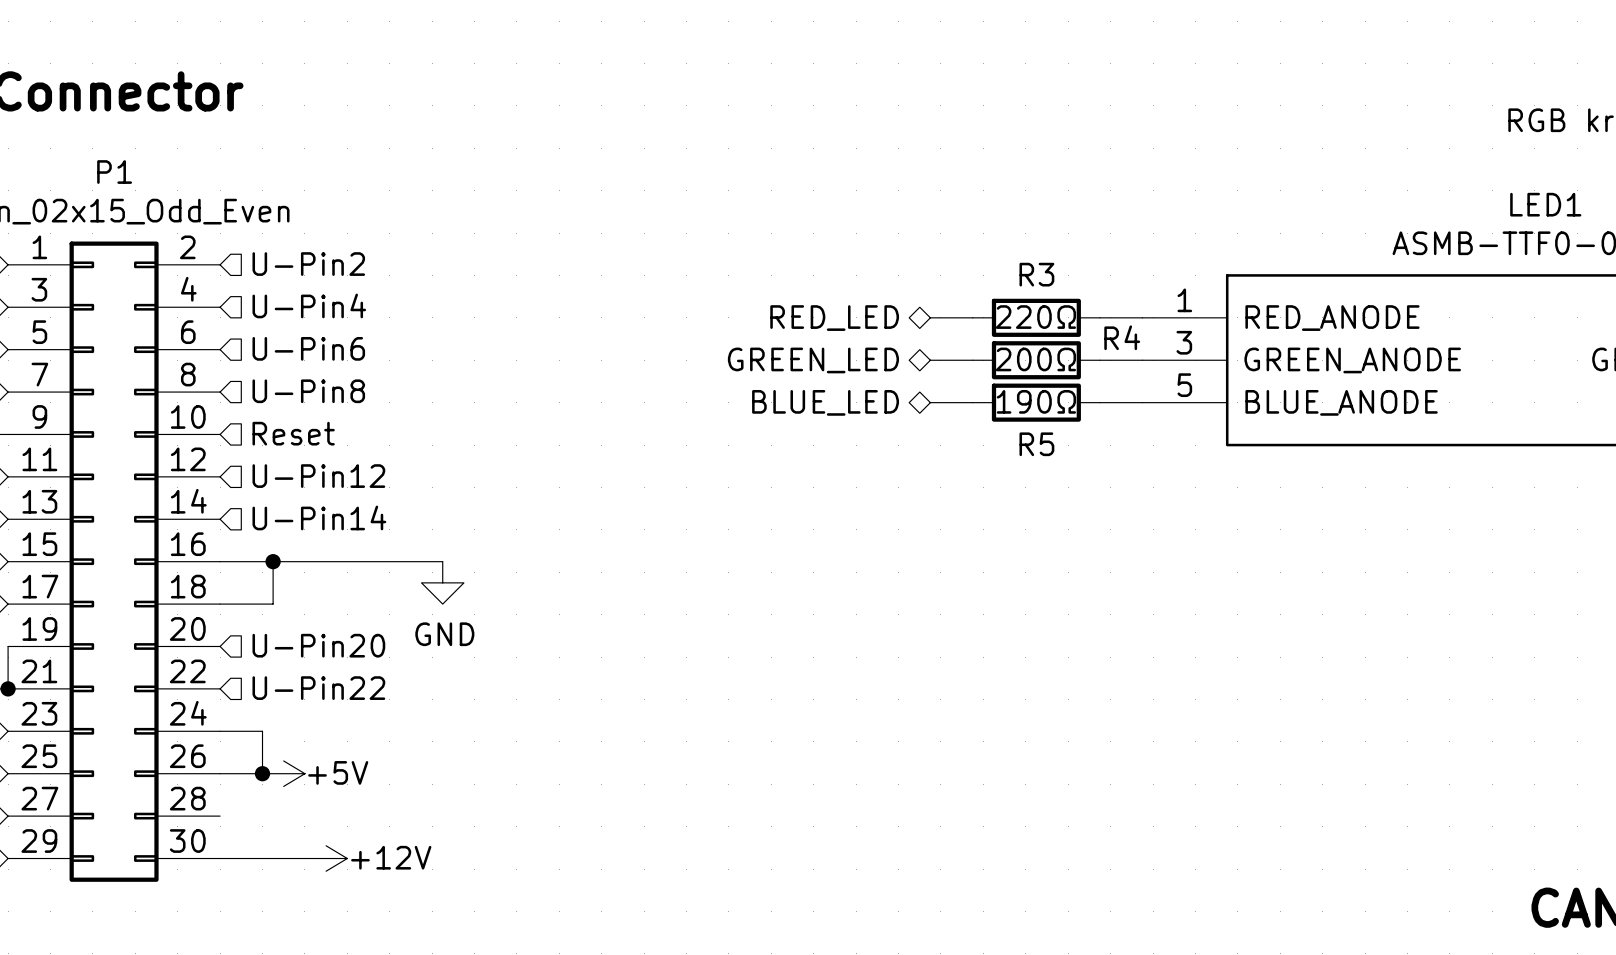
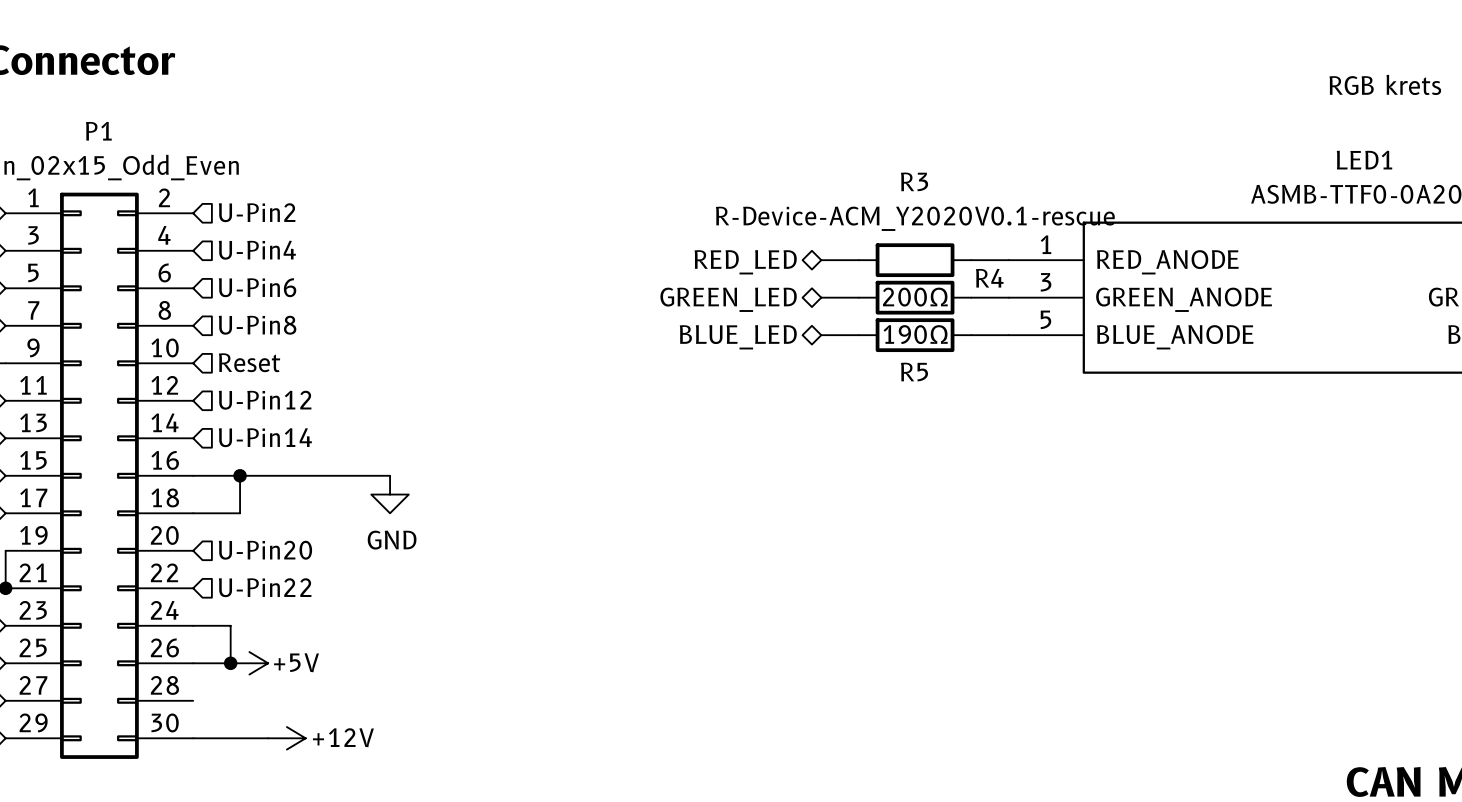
R3 name position: R3 (1036, 274) -> R3 (914, 181)
R3 value: 220Ω (1035, 317) -> R-Device-ACM_Y2020V0.1-rescue (915, 218)

